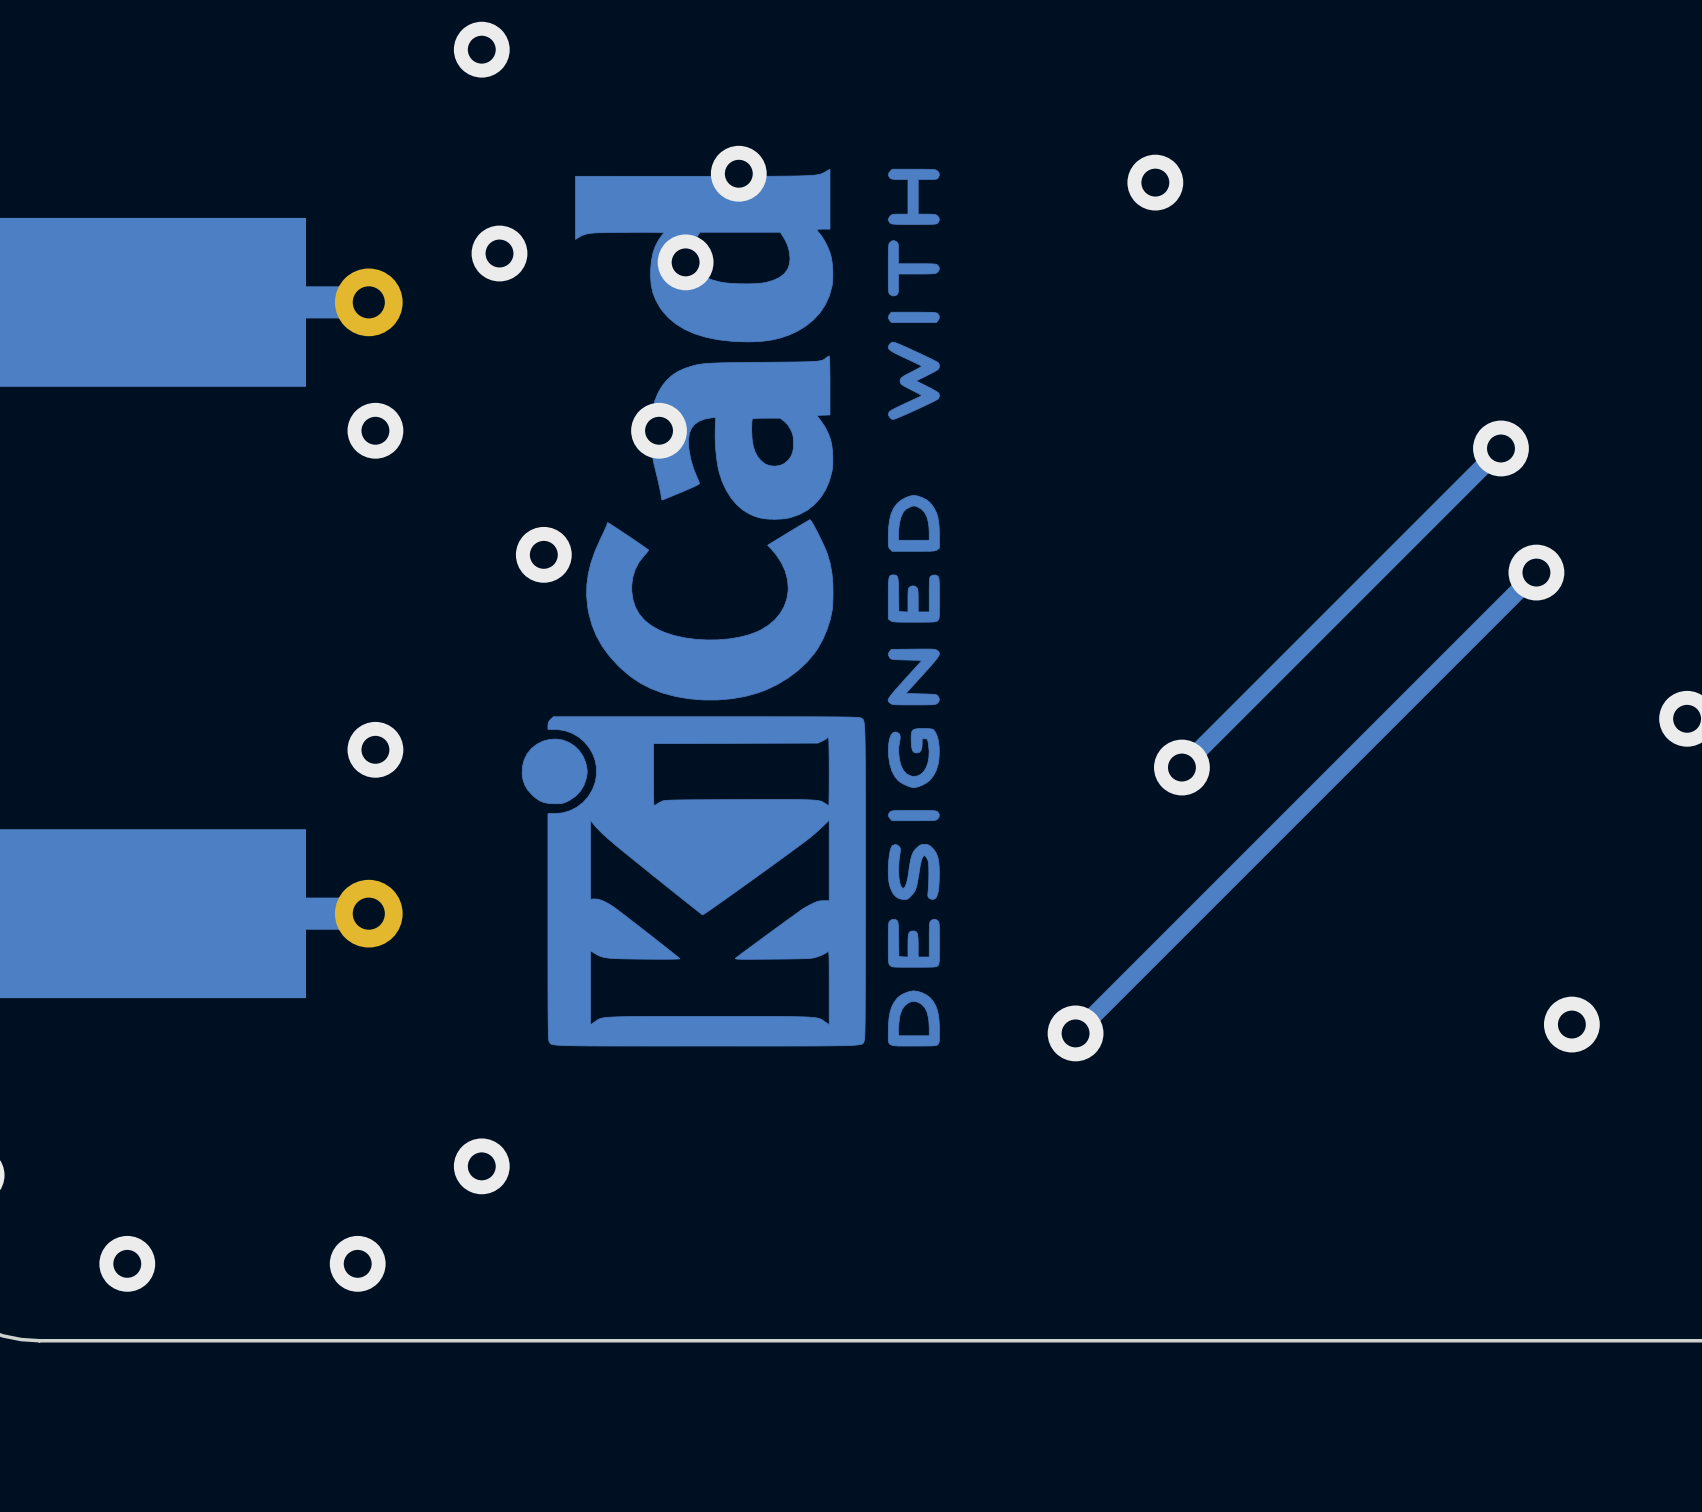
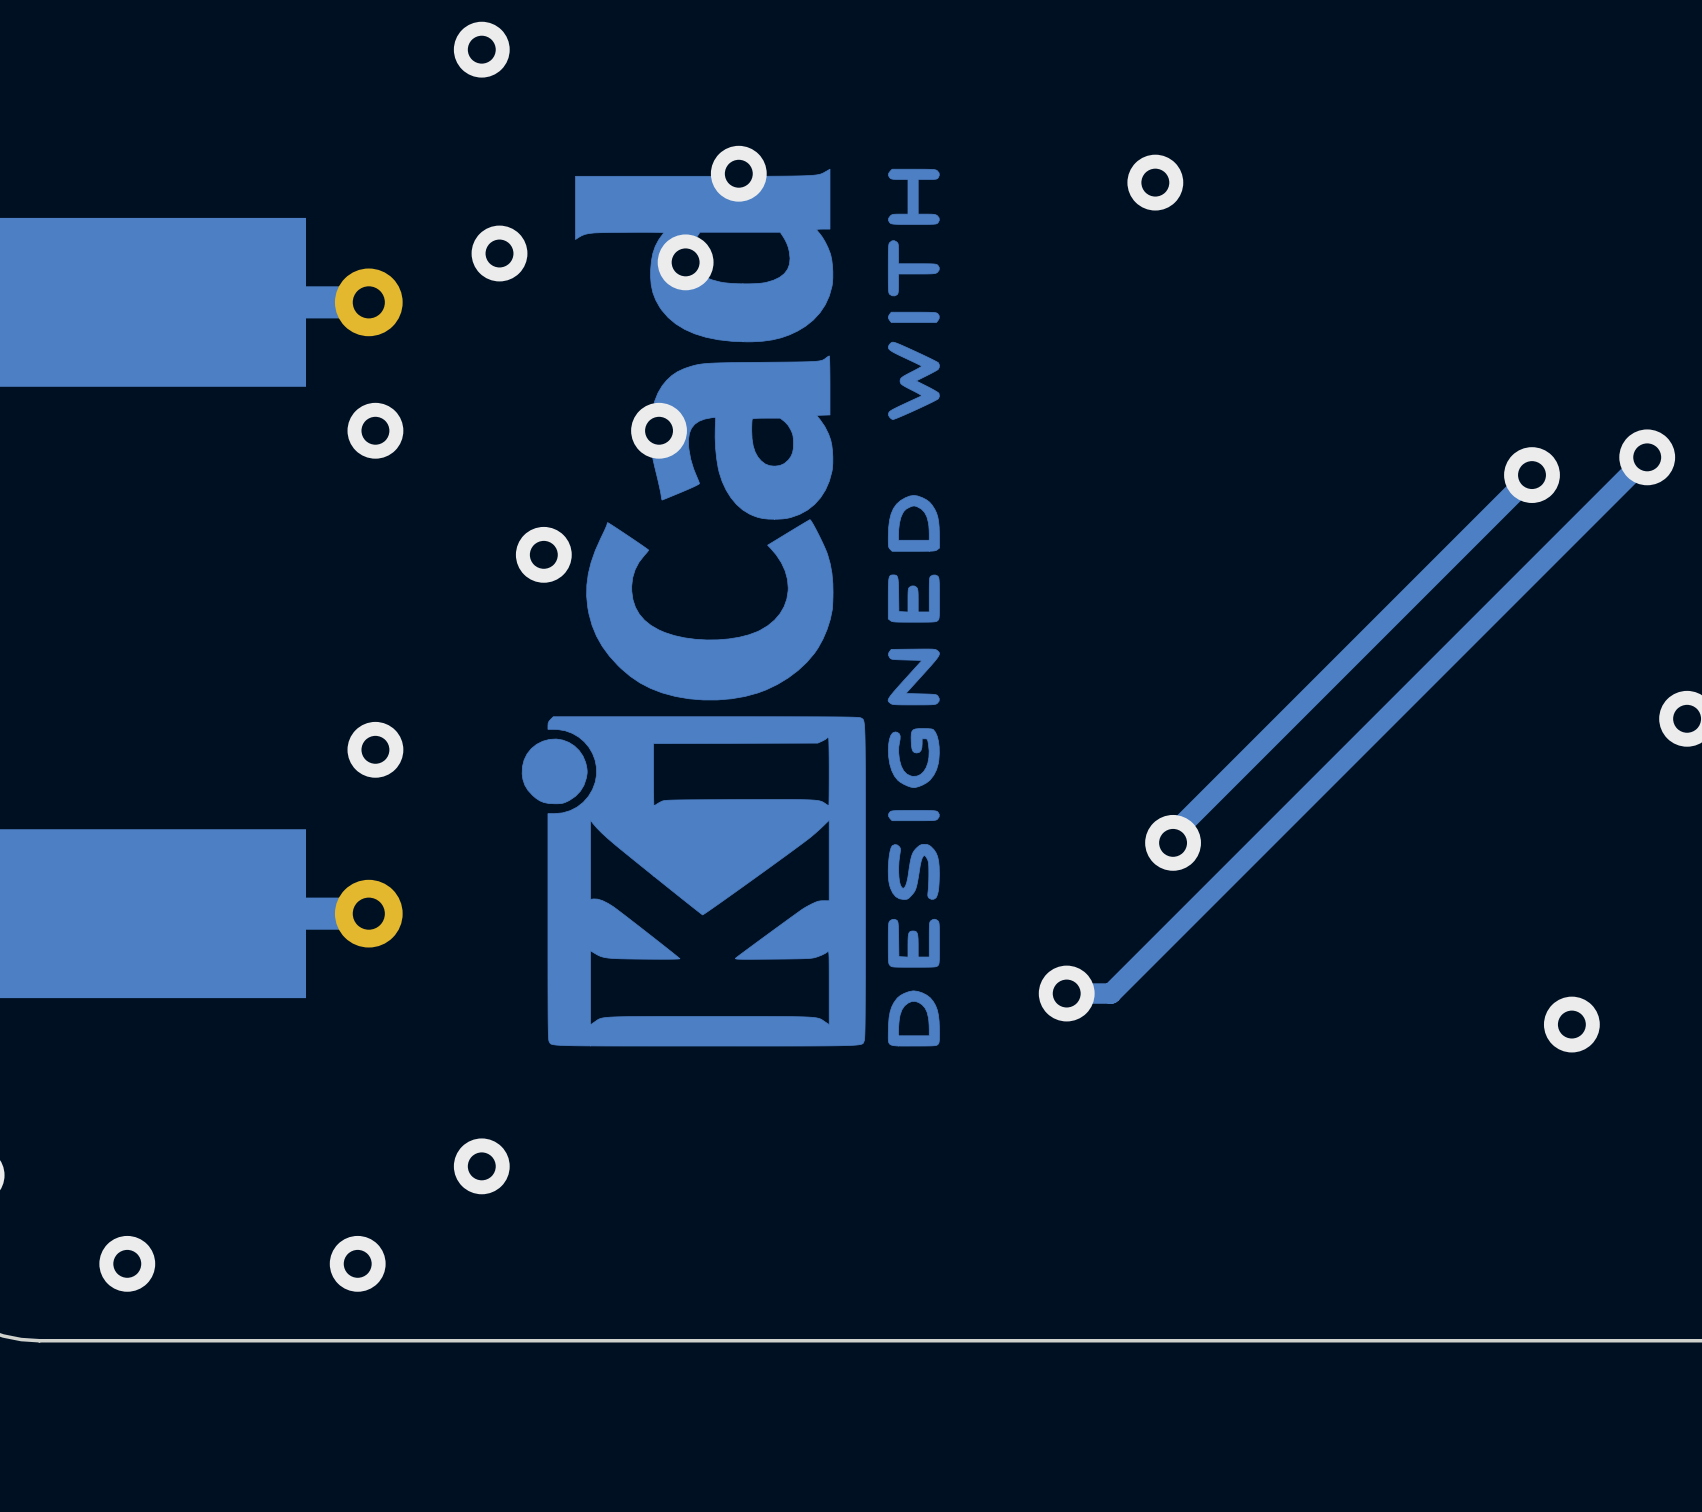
track: (1500, 448) (1181, 767) -> none
via position: (1500, 448) -> (1532, 475)
track: none -> (1647, 457) (1111, 993) (1066, 993)
via: none -> (1647, 457)
track: none -> (1532, 475) (1173, 834) (1173, 842)
track: (1536, 572) (1075, 1033) -> none
via: (1536, 572) -> none
via position: (1181, 767) -> (1173, 842)
via position: (1075, 1033) -> (1066, 993)

